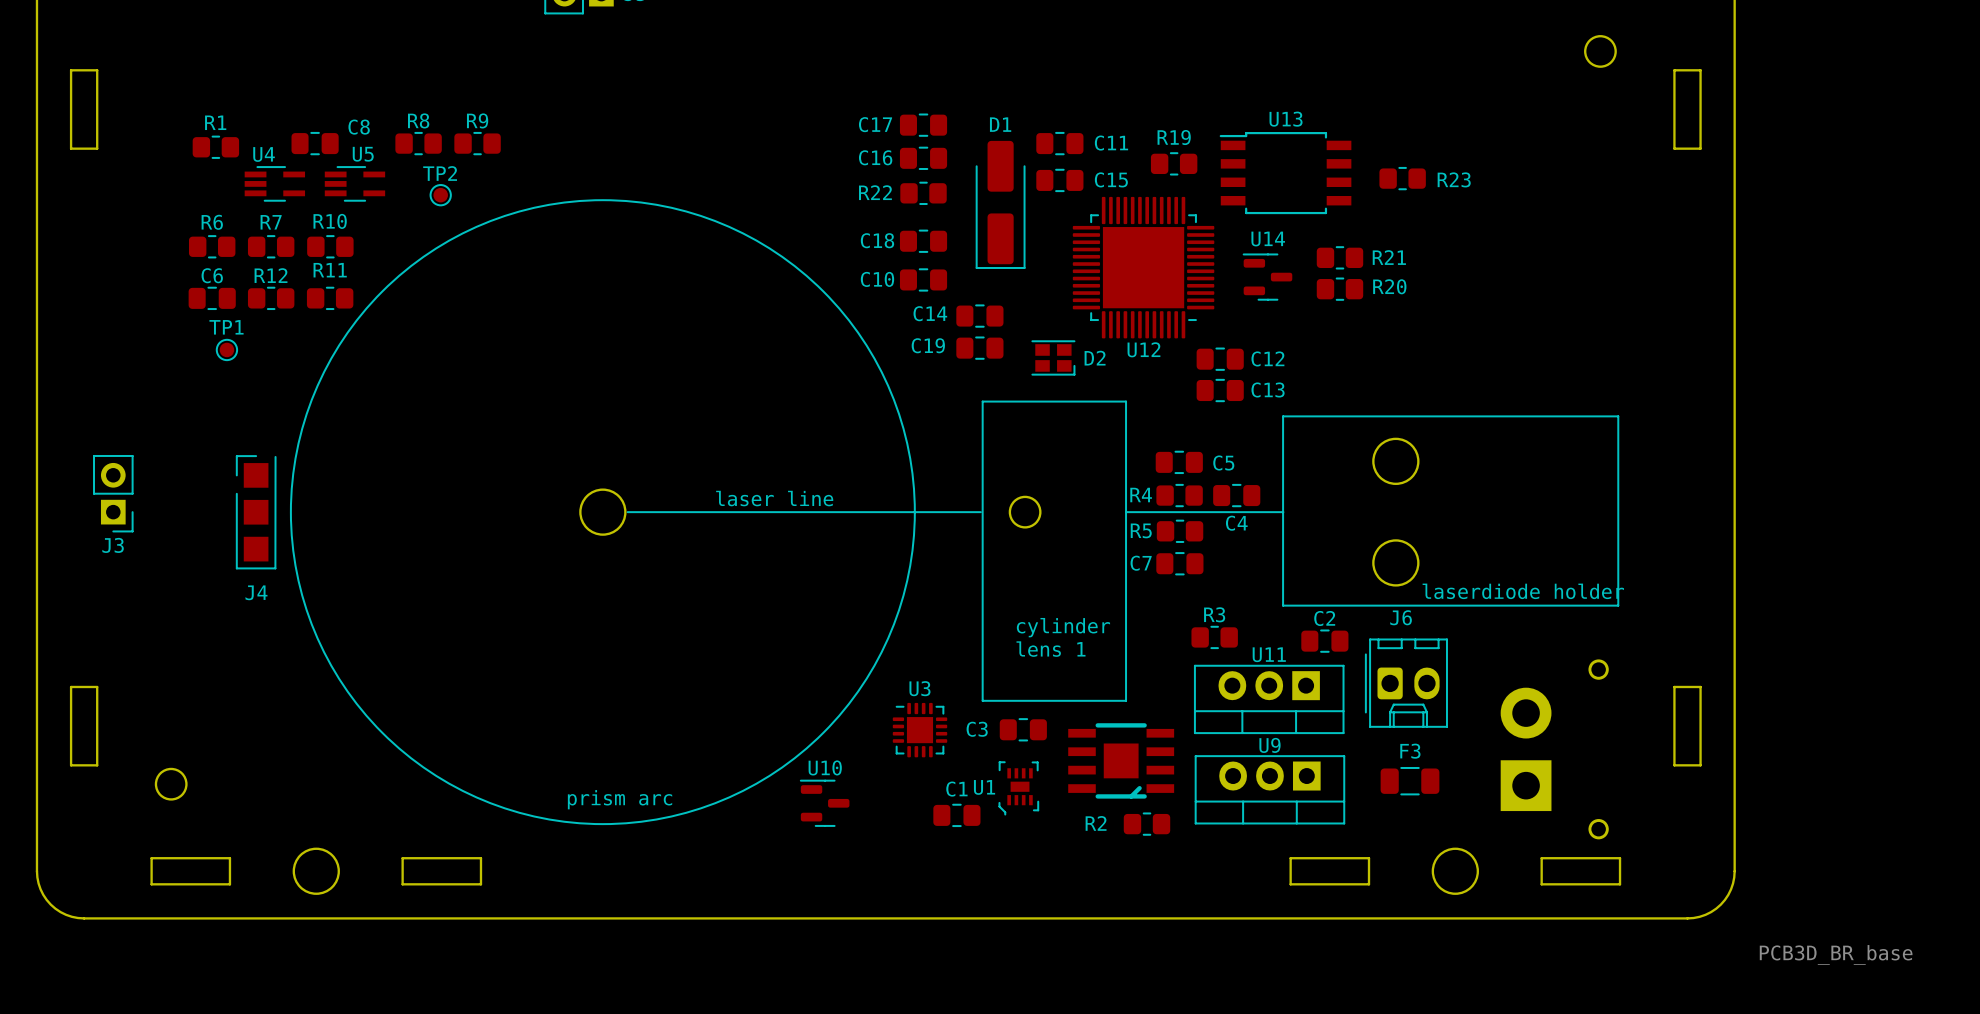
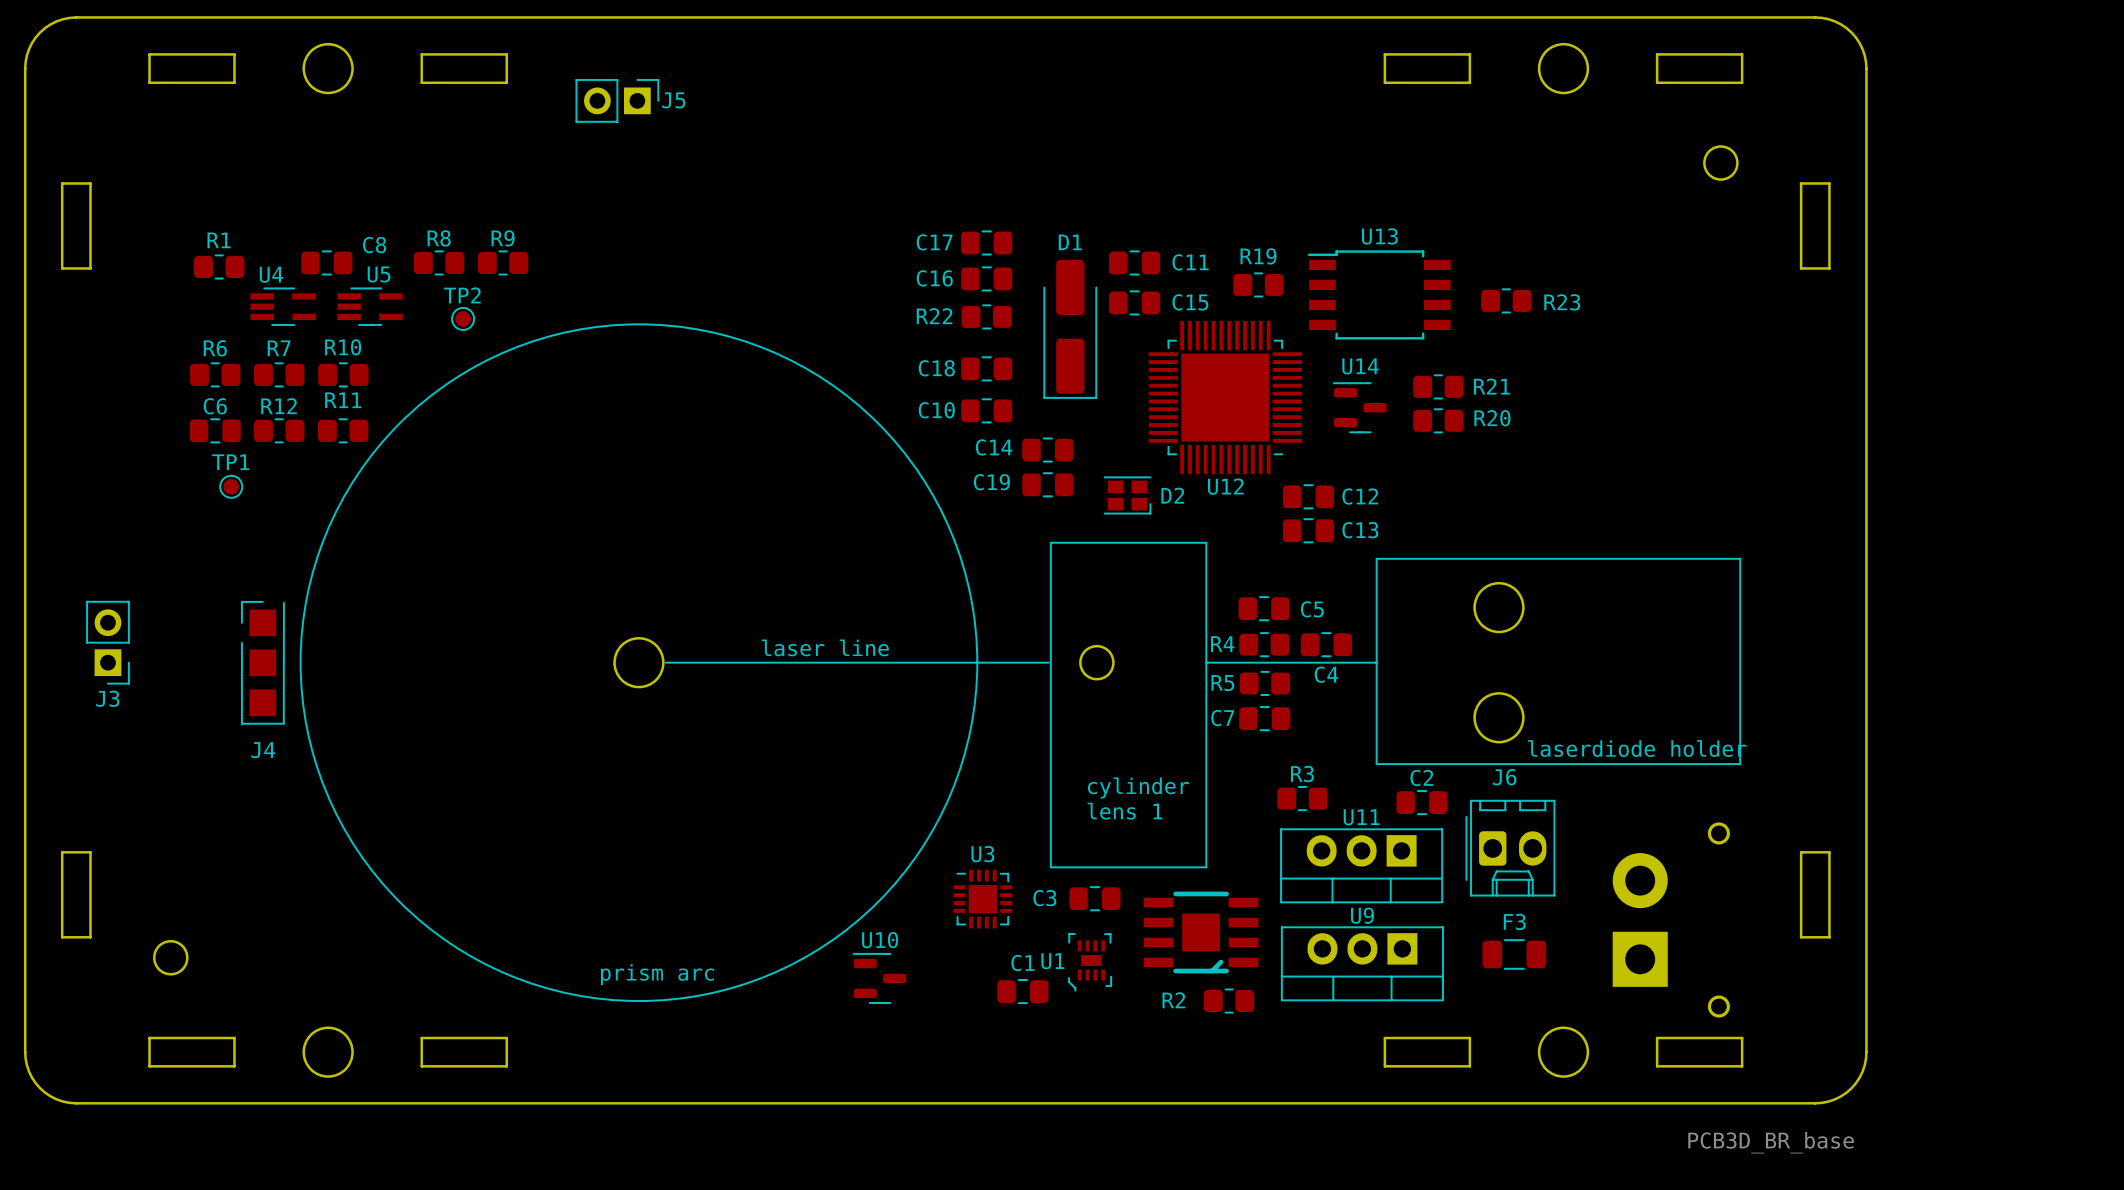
text position: PCB3D_BR_base (1836, 954) -> PCB3D_BR_base (1771, 1142)

